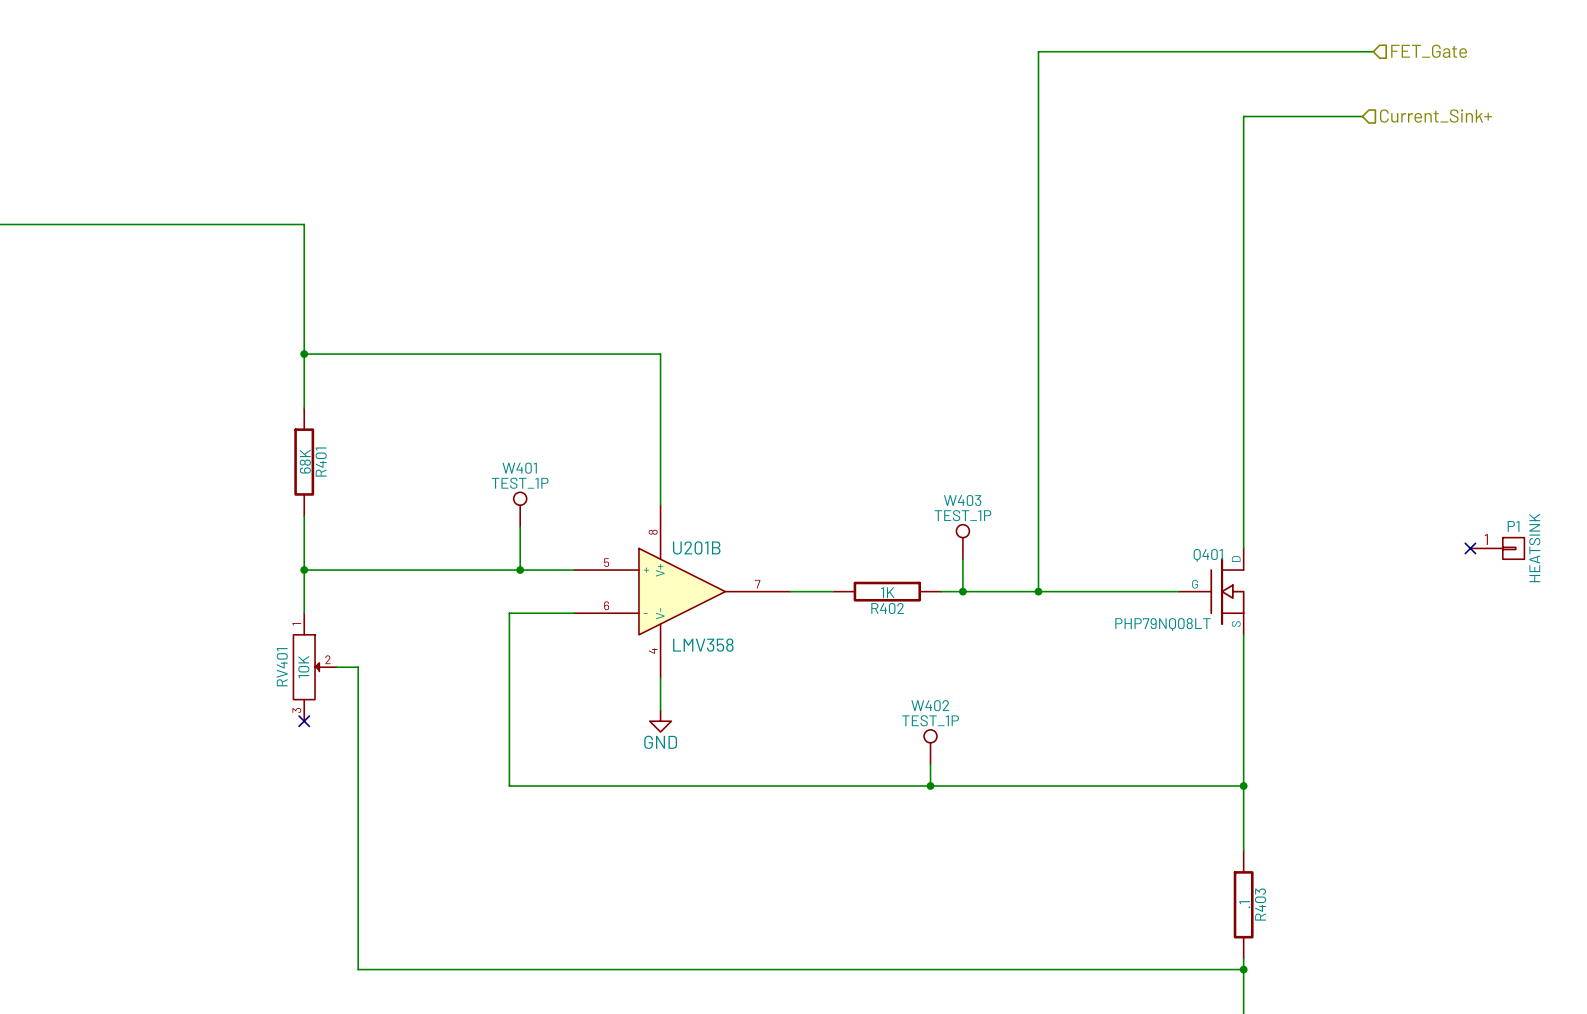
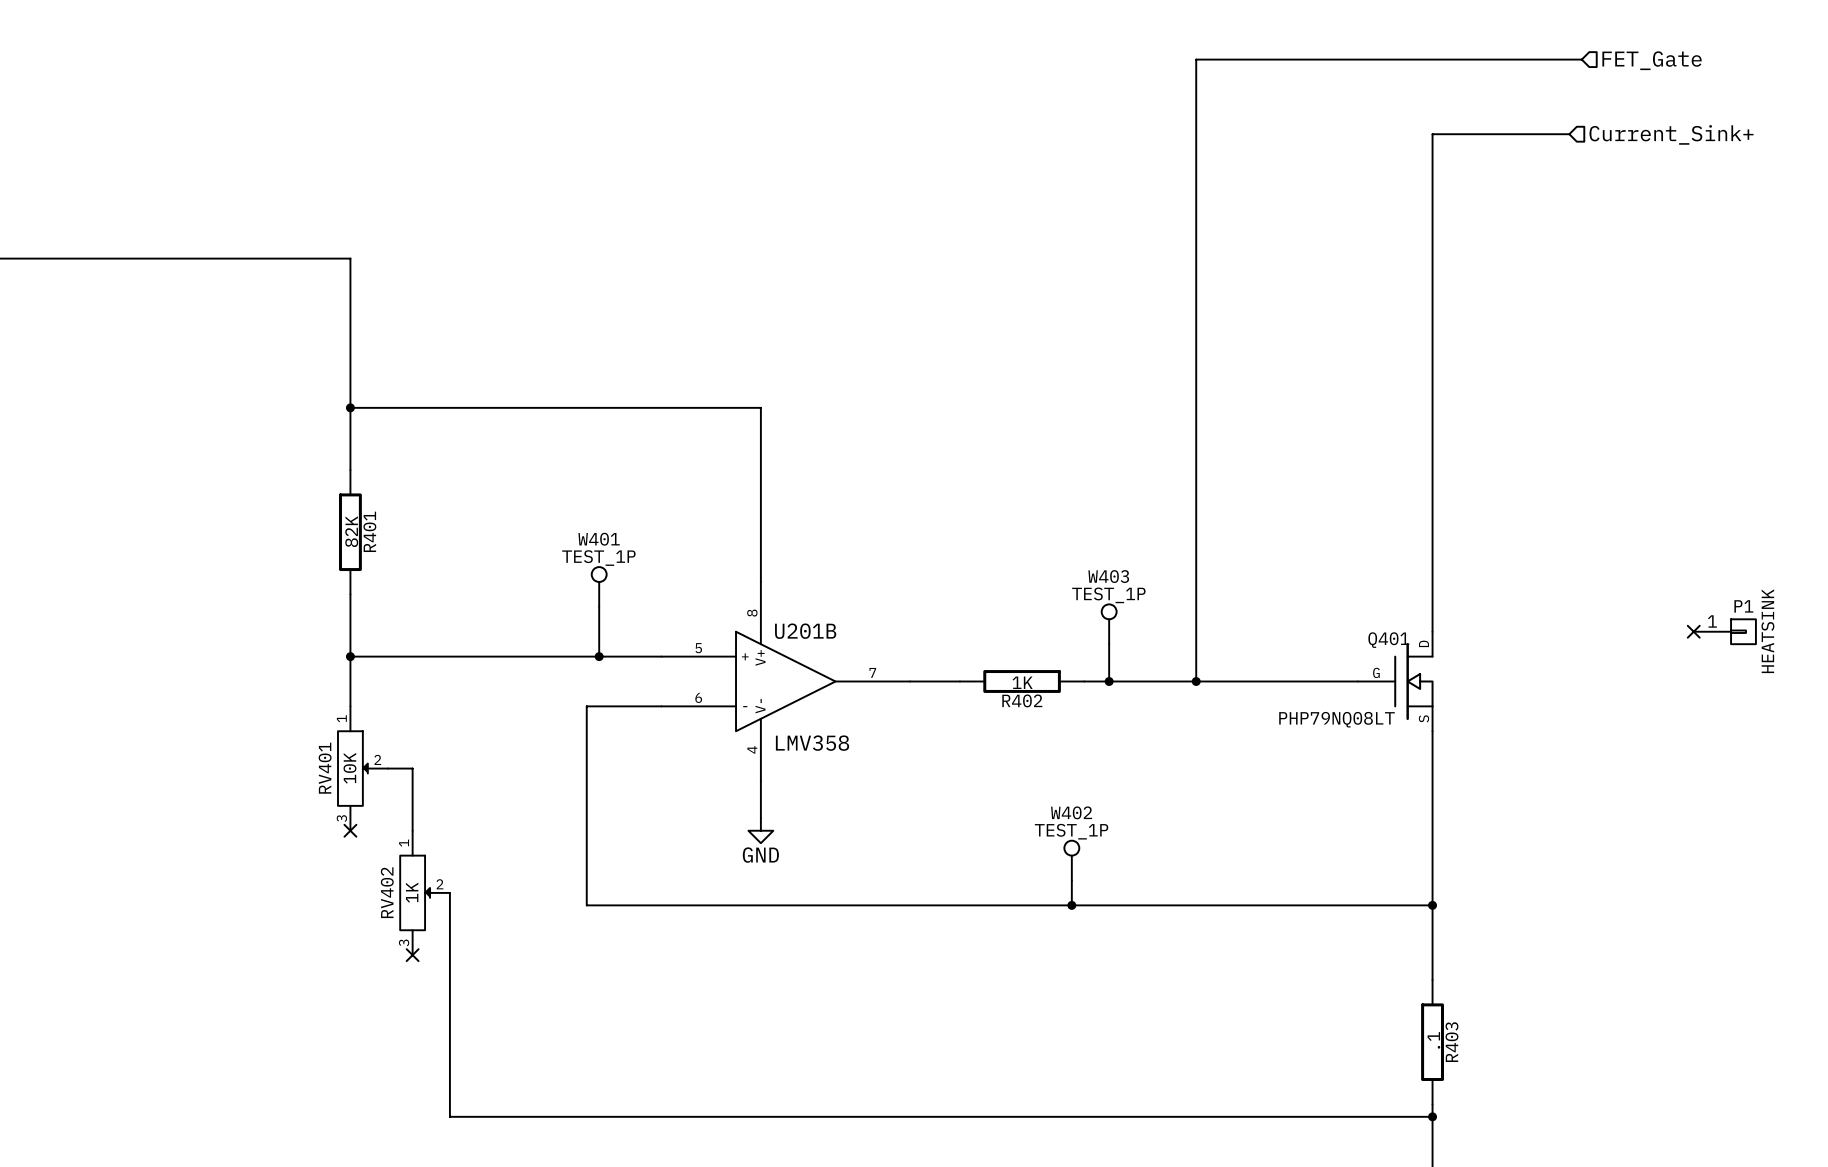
R401 value: 68K (305, 461) -> 82K (351, 531)
wire: (358, 721) (358, 969) (390, 969) -> (449, 892) (449, 1116)
RV402: none -> 1K (425, 892)
no-connect mark: none -> (412, 955)

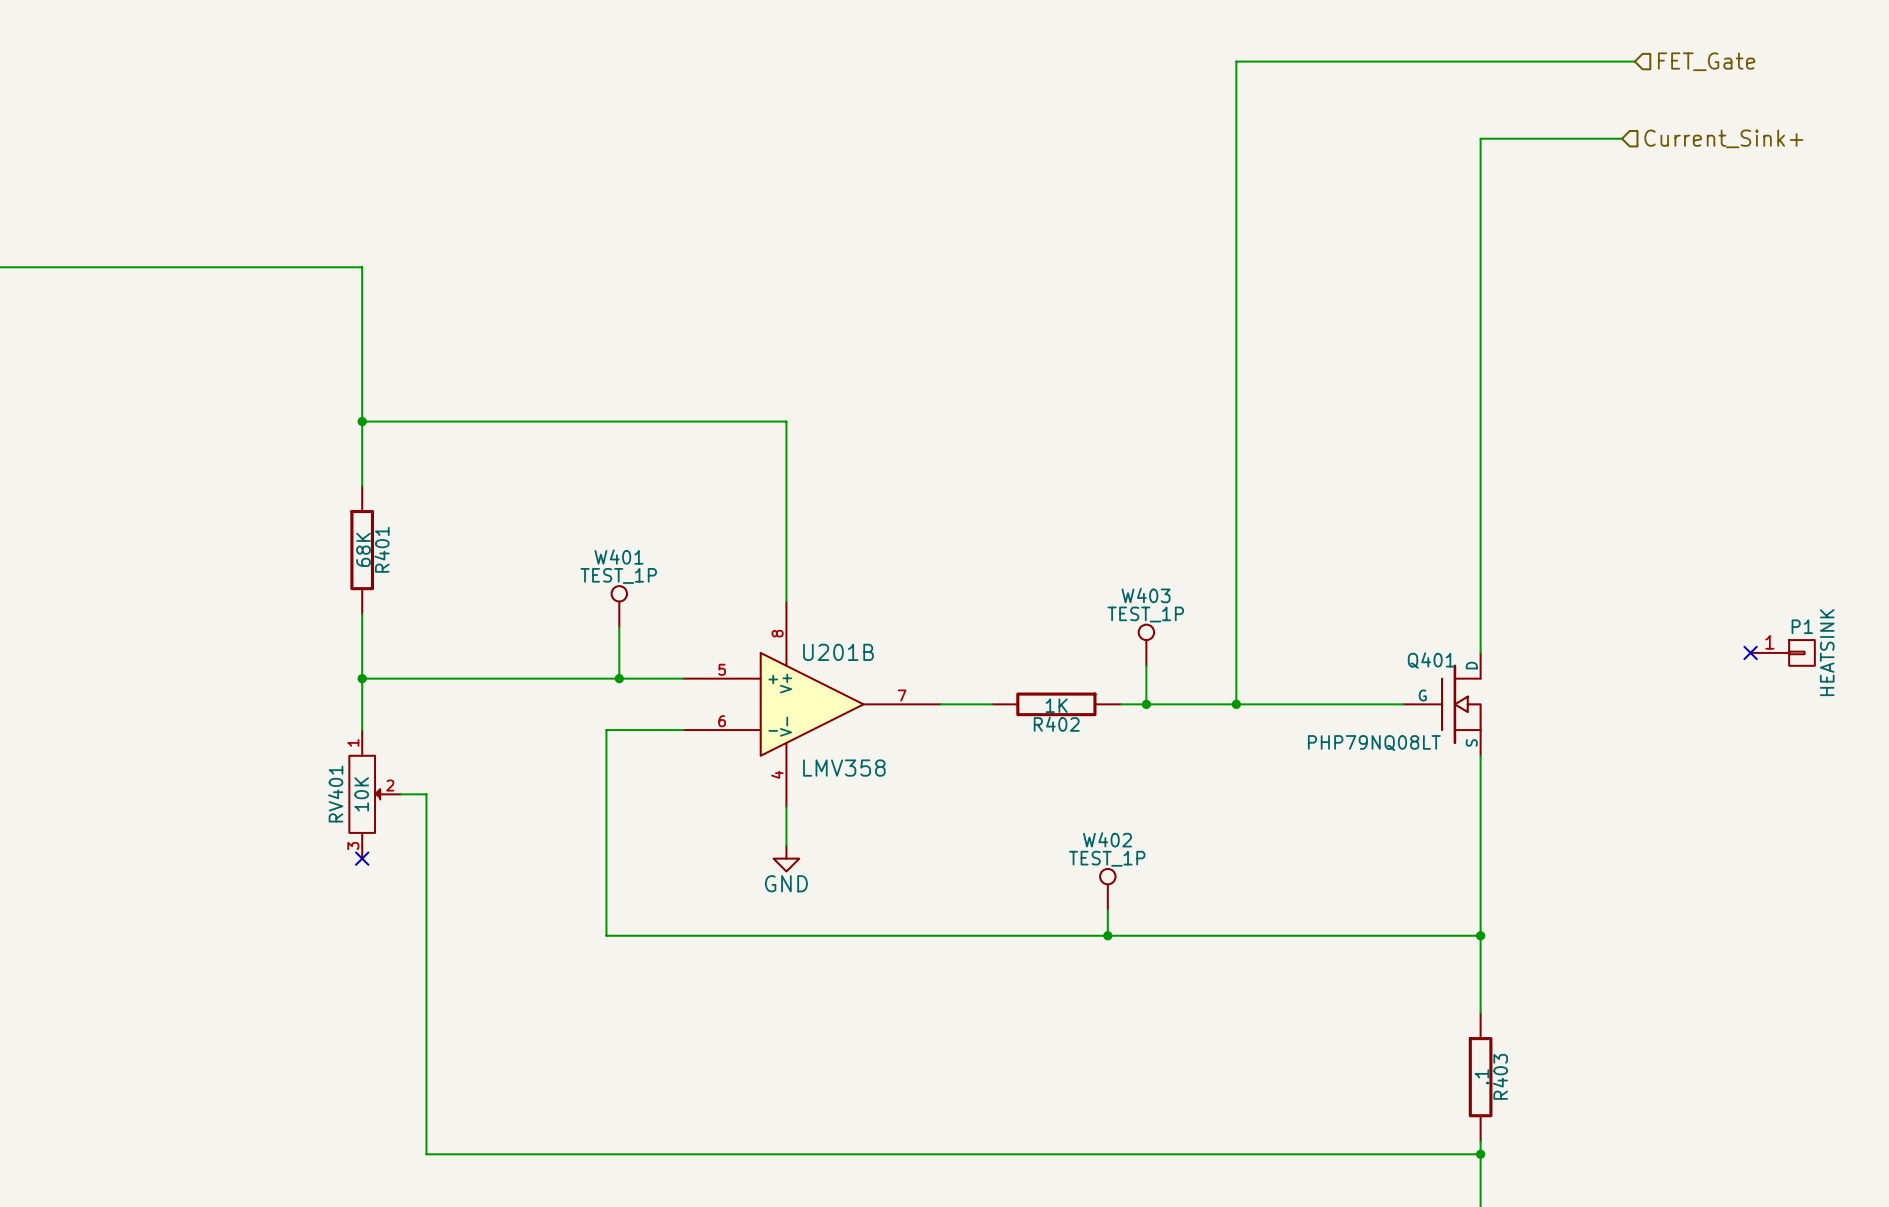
R401 value: 82K (351, 531) -> 68K (363, 549)
RV402: 1K (425, 892) -> none
wire: (449, 892) (449, 1116) -> (426, 858) (426, 1154) (465, 1154)
no-connect mark: (412, 955) -> none

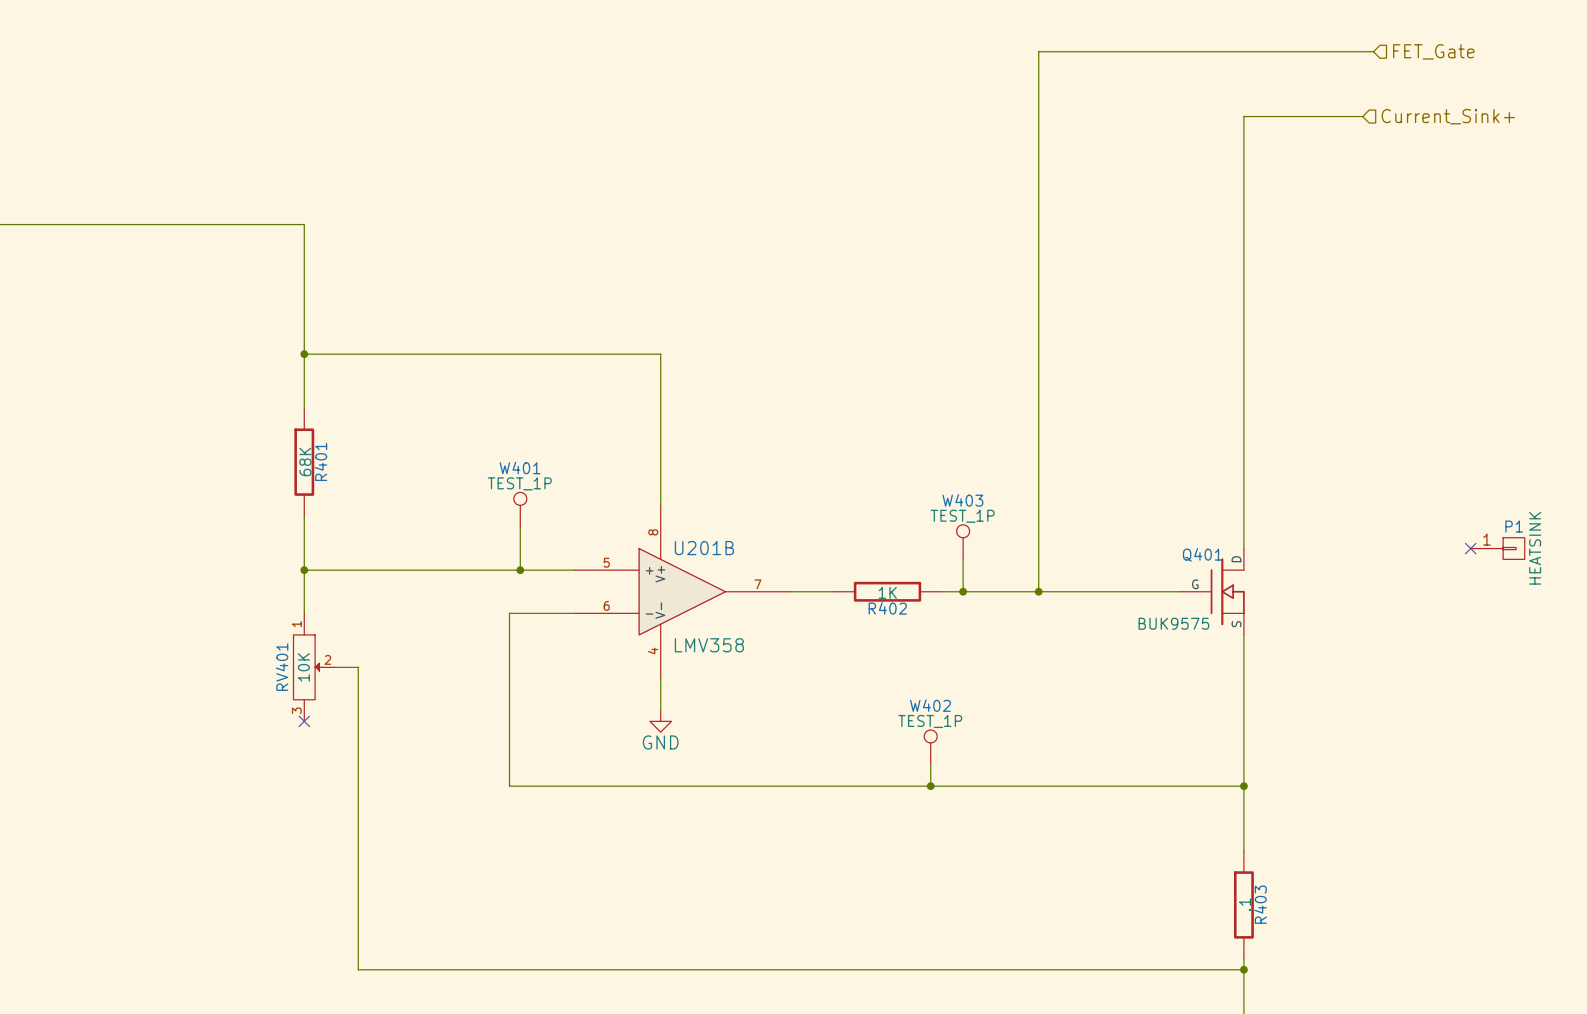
Q401 value: PHP79NQ08LT (1374, 743) -> BUK9575 (1173, 623)

